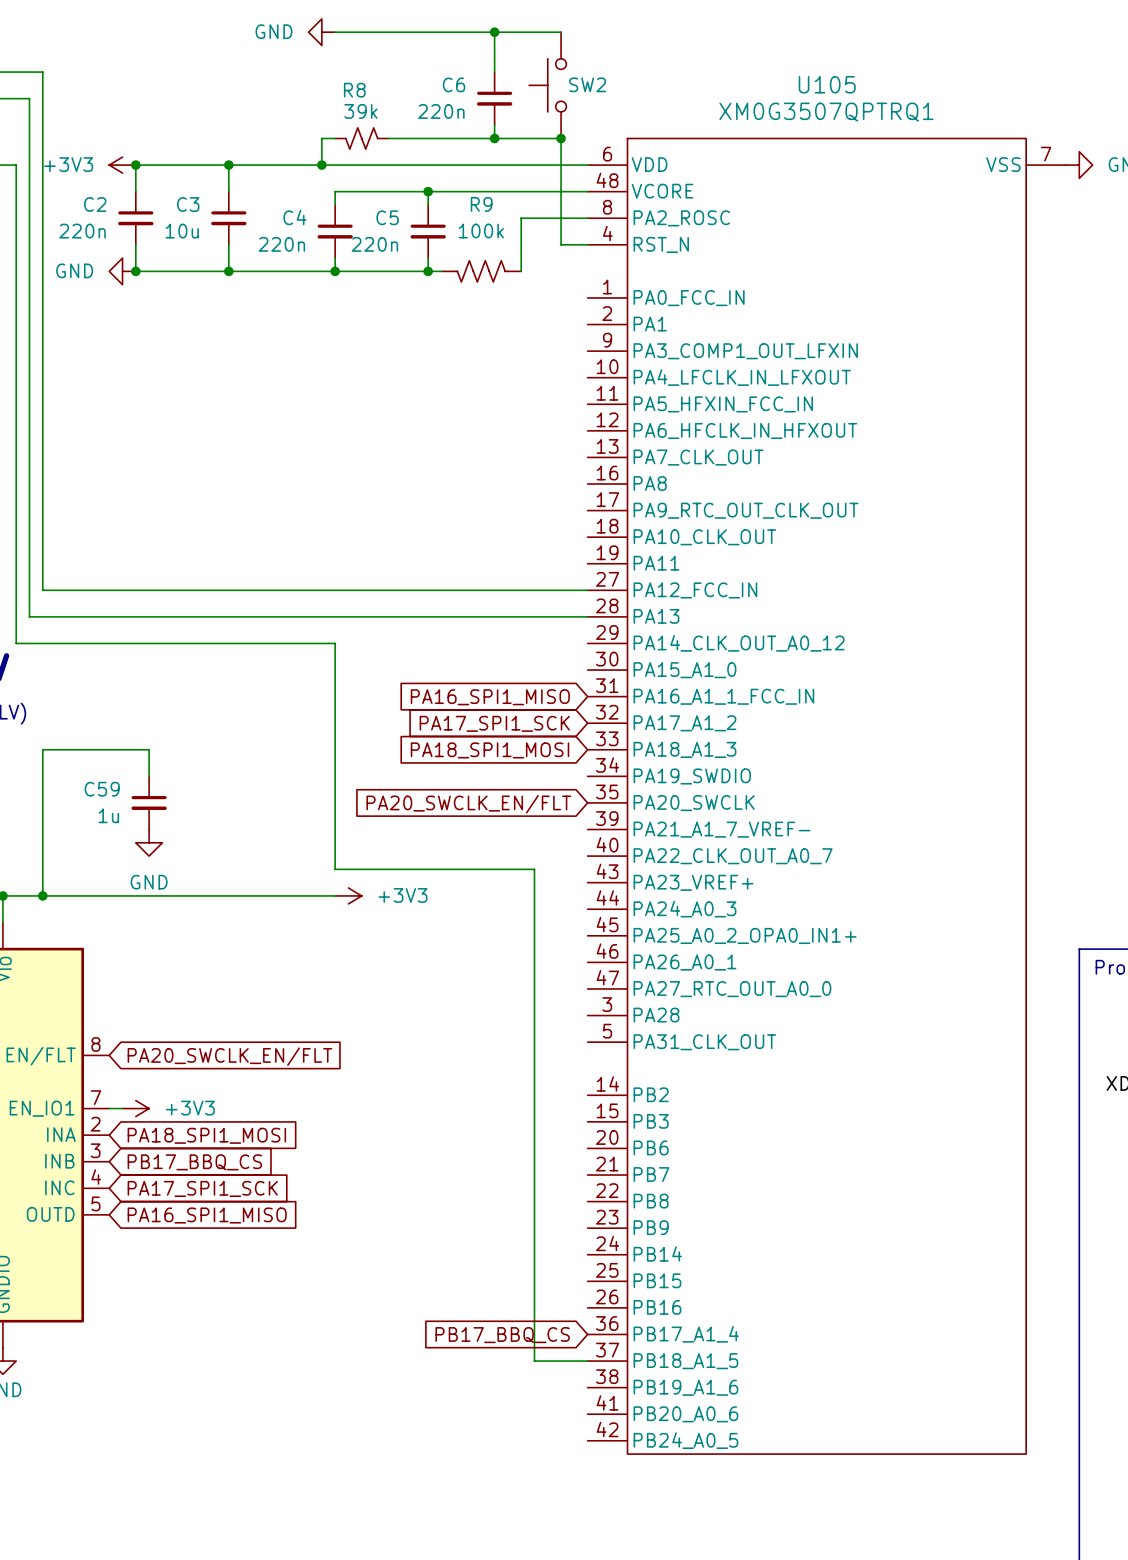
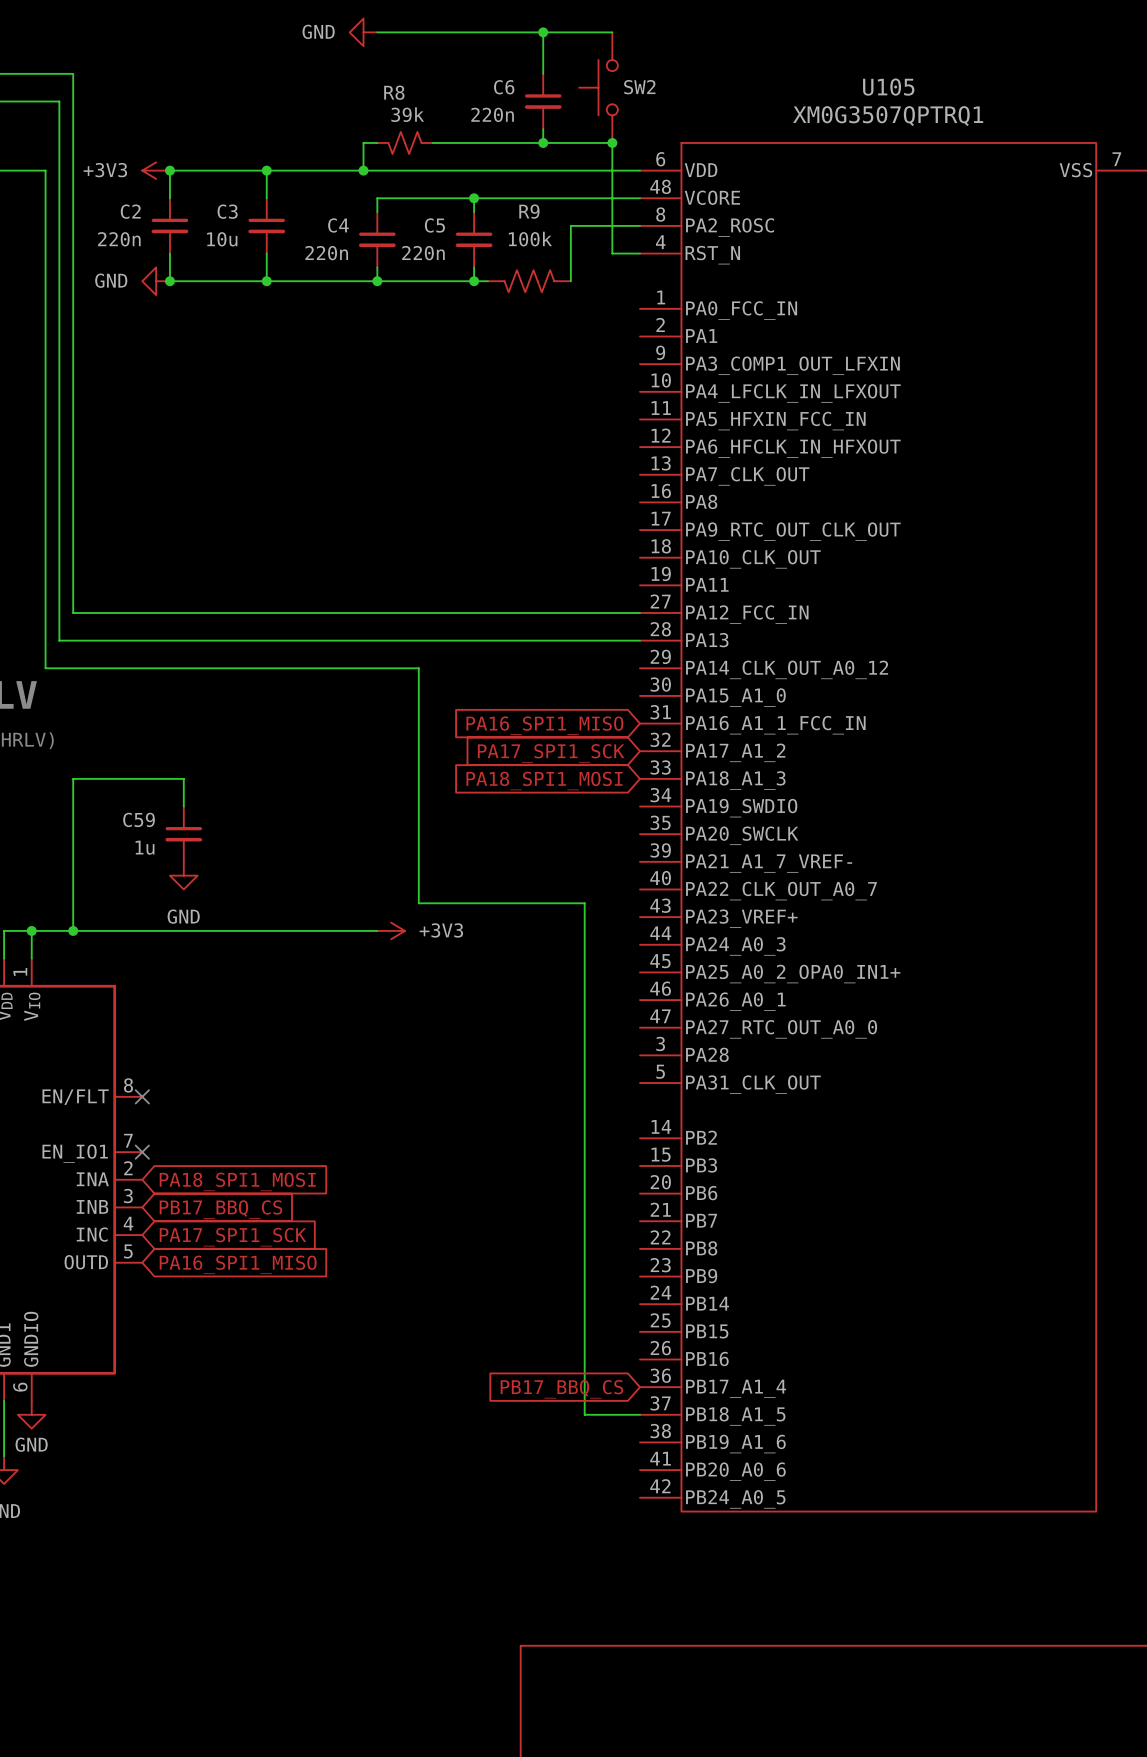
wire: (335, 643) (335, 869) (375, 869) -> (377, 668) (418, 668) (418, 903)
global label: PA20_SWCLK_EN/FLT (468, 804) -> none
no-connect mark: none -> (142, 1096)
global label: PA20_SWCLK_EN/FLT (229, 1056) -> none
wire: (109, 1108) (122, 1108) -> none
no-connect mark: none -> (142, 1152)
power symbol: +3V3 (135, 1108) -> none

